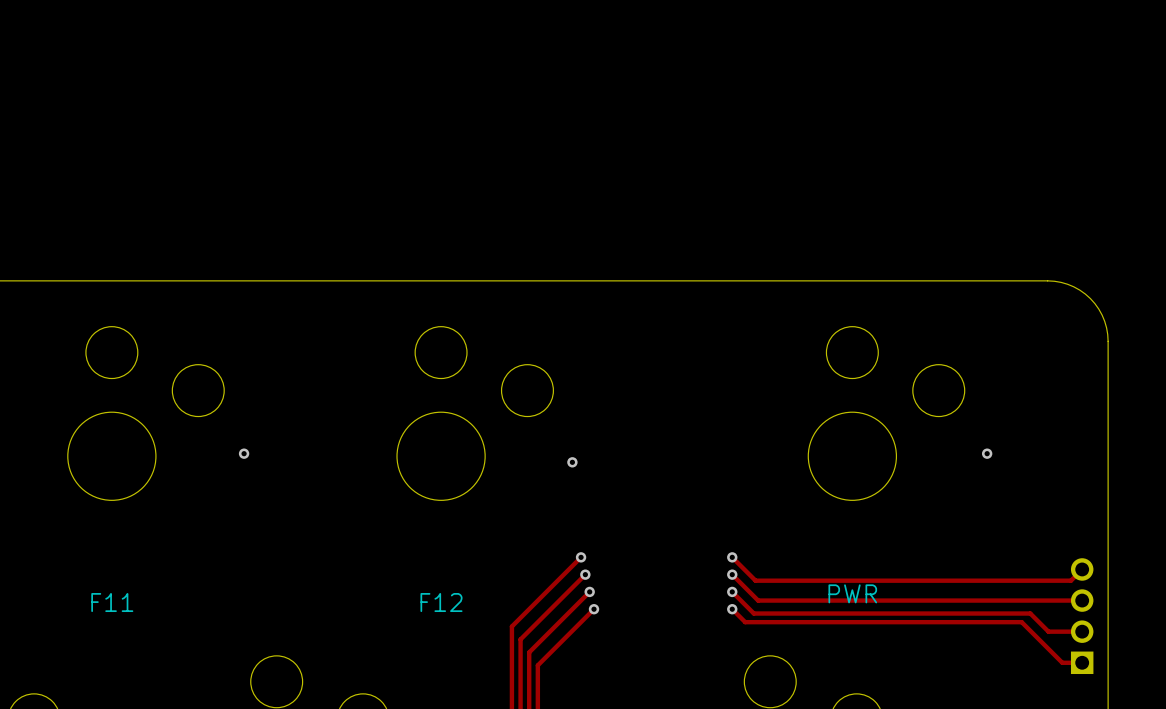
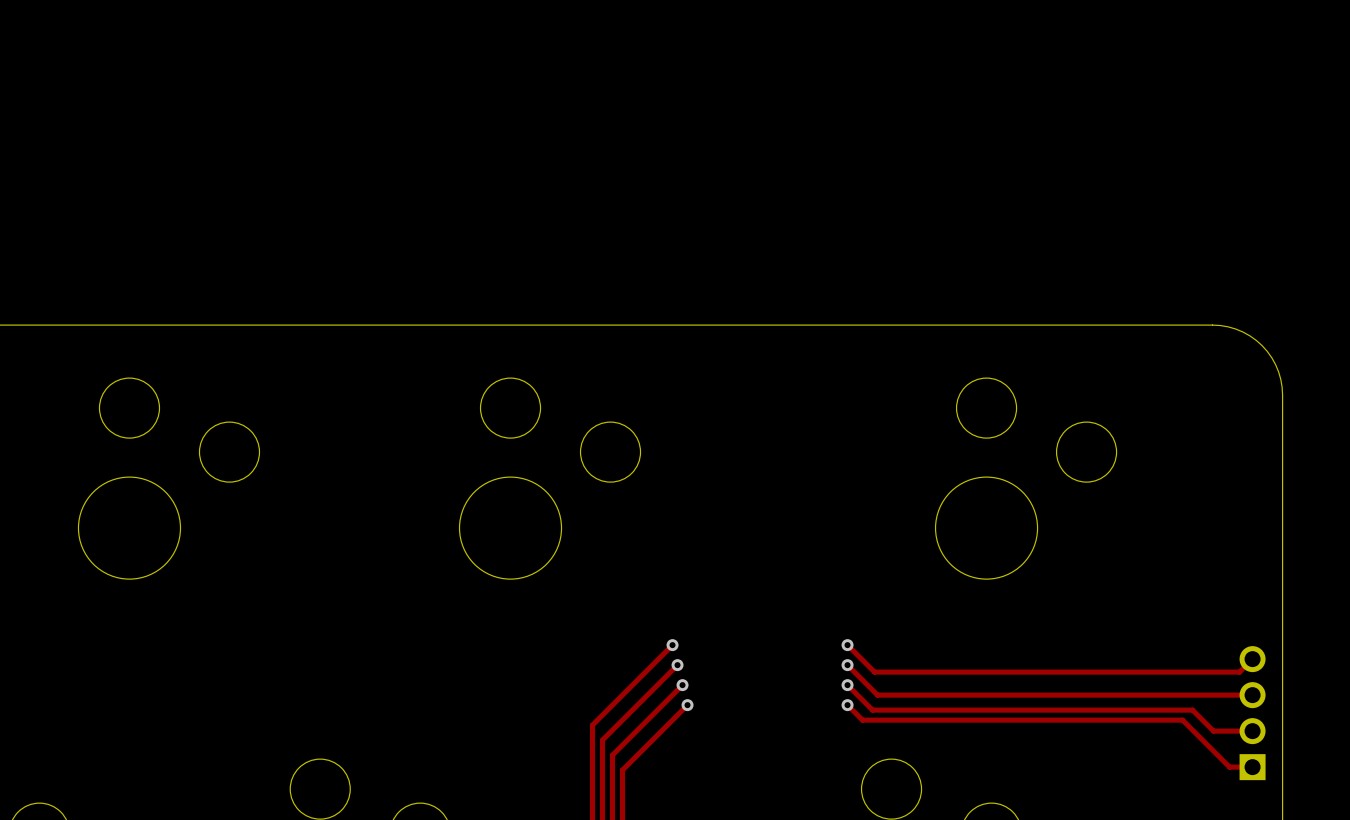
via: (244, 453) -> none
via: (987, 453) -> none
via: (572, 462) -> none
part value: PWR (852, 593) -> none
part value: F11 (112, 602) -> none
part value: F12 (441, 602) -> none

